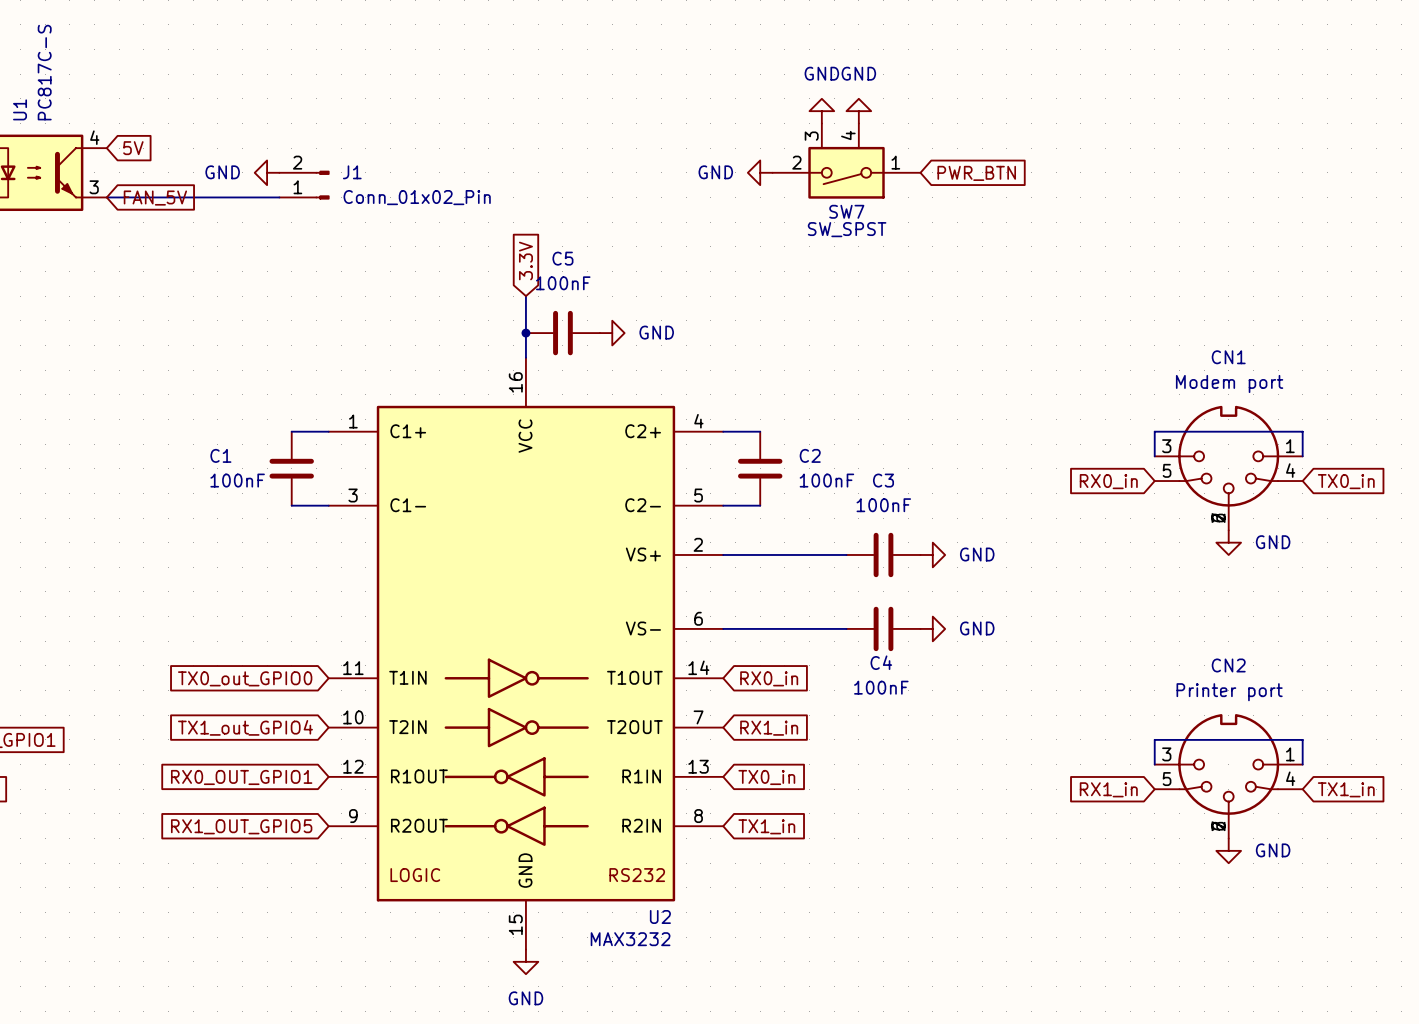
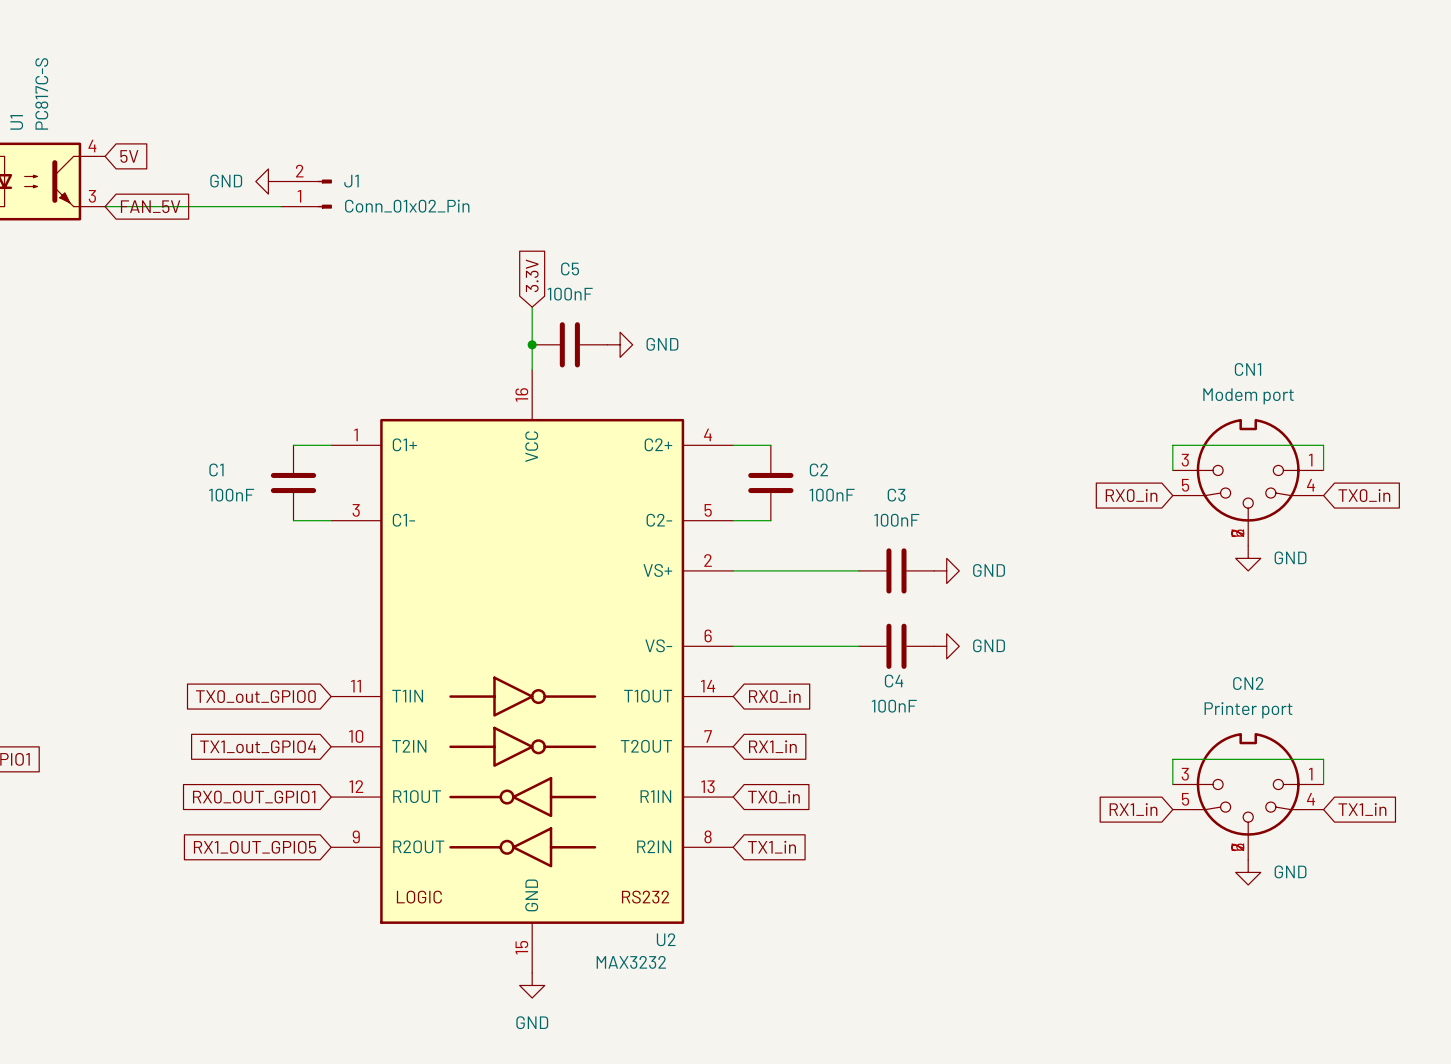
power symbol: GND (821, 111) -> none
power symbol: GND (858, 111) -> none
SW7: SW_SPST (846, 161) -> none
power symbol: GND (760, 172) -> none
global label: PWR_BTN (976, 173) -> none

